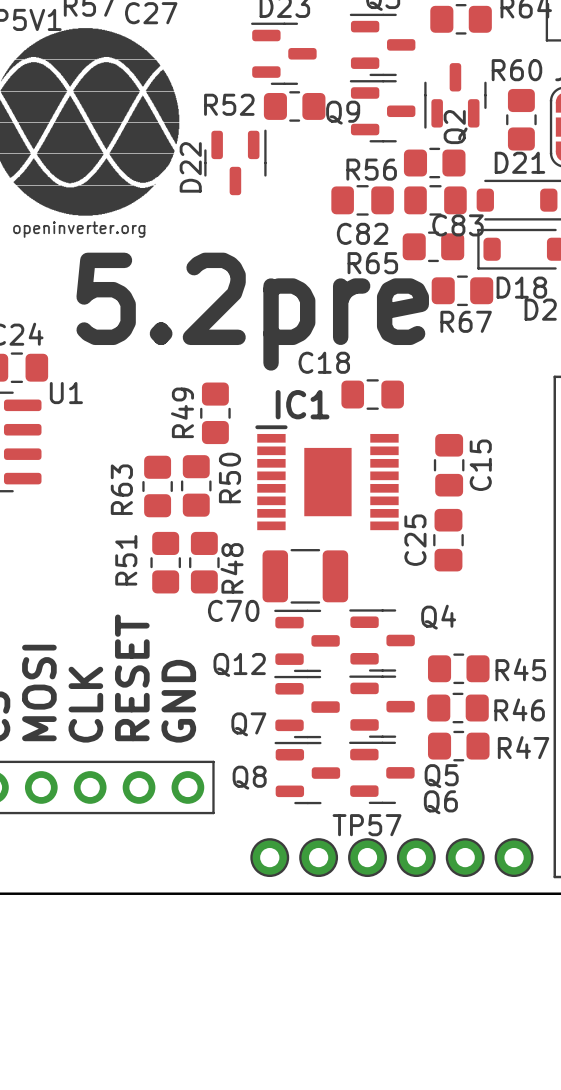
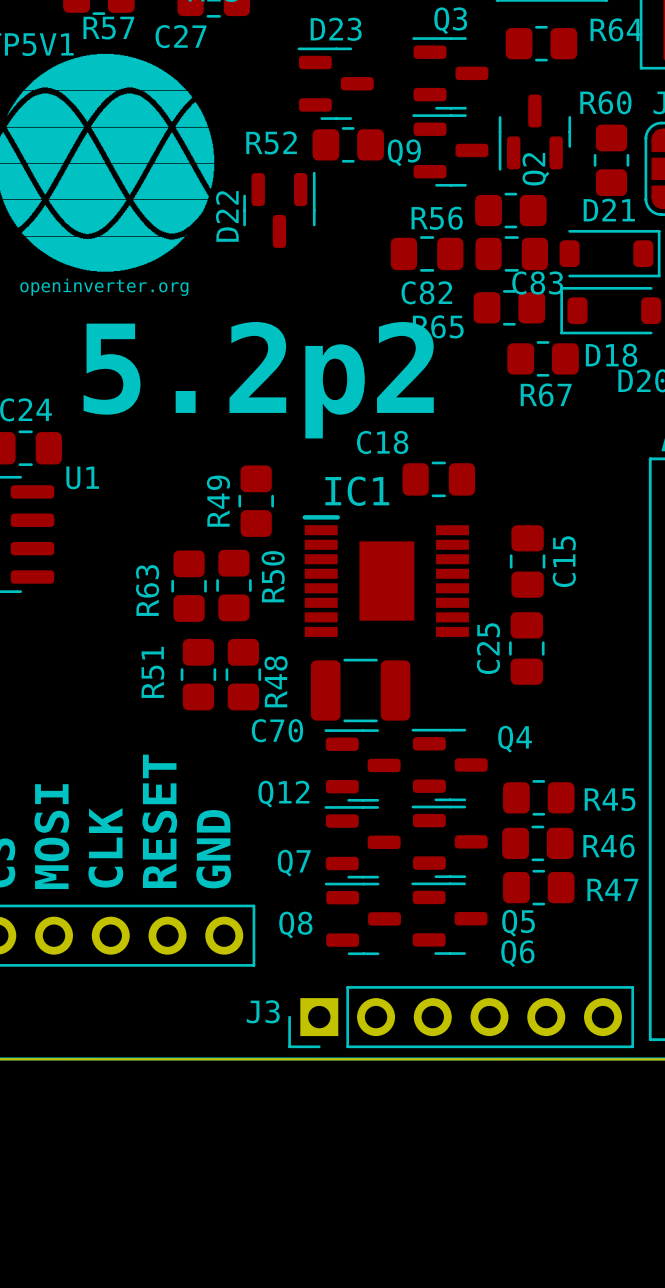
text: 5.2pre (252, 311) -> 5.2p2 (258, 380)
part: (269, 857) -> none
part: (318, 857) -> none
TP57: (367, 857) -> none
J3: none -> (461, 1017)
part: (416, 857) -> none
part: (465, 857) -> none
part: (514, 857) -> none

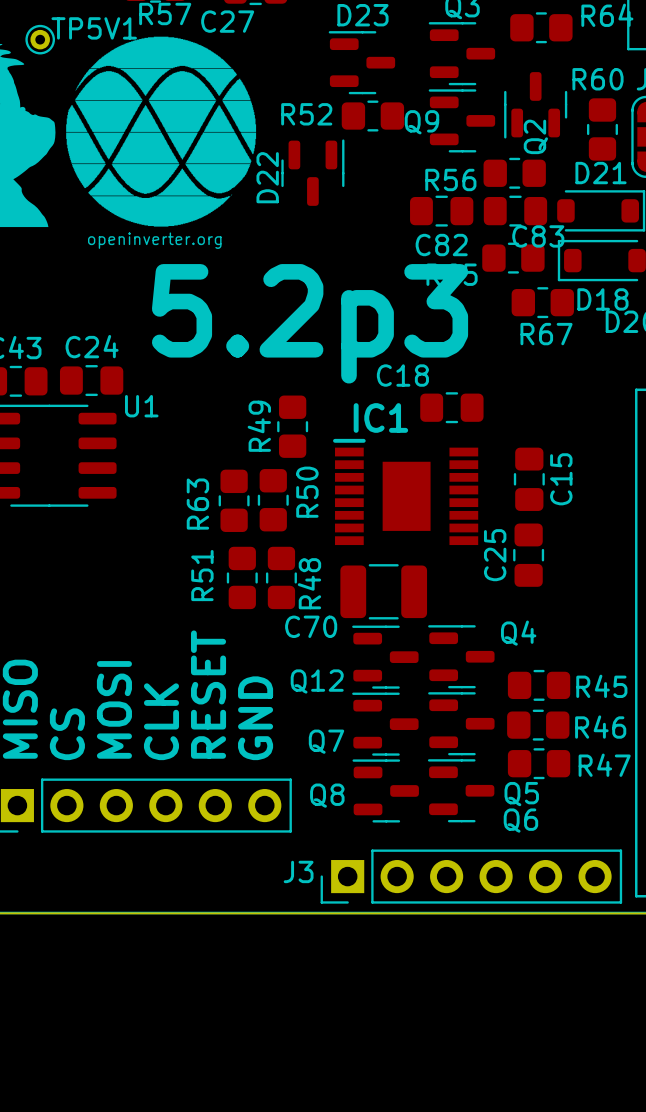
text: 5.2p2 (258, 380) -> 5.2p3 (310, 323)

